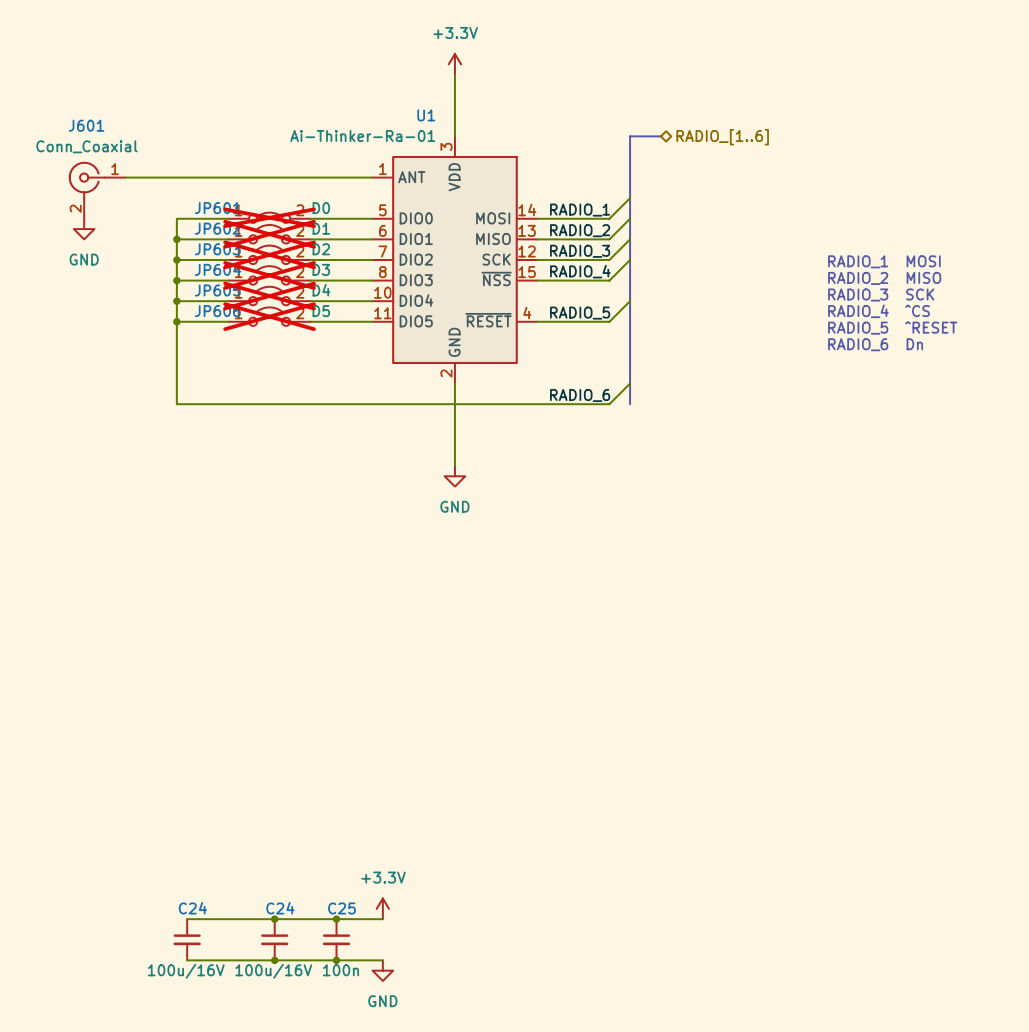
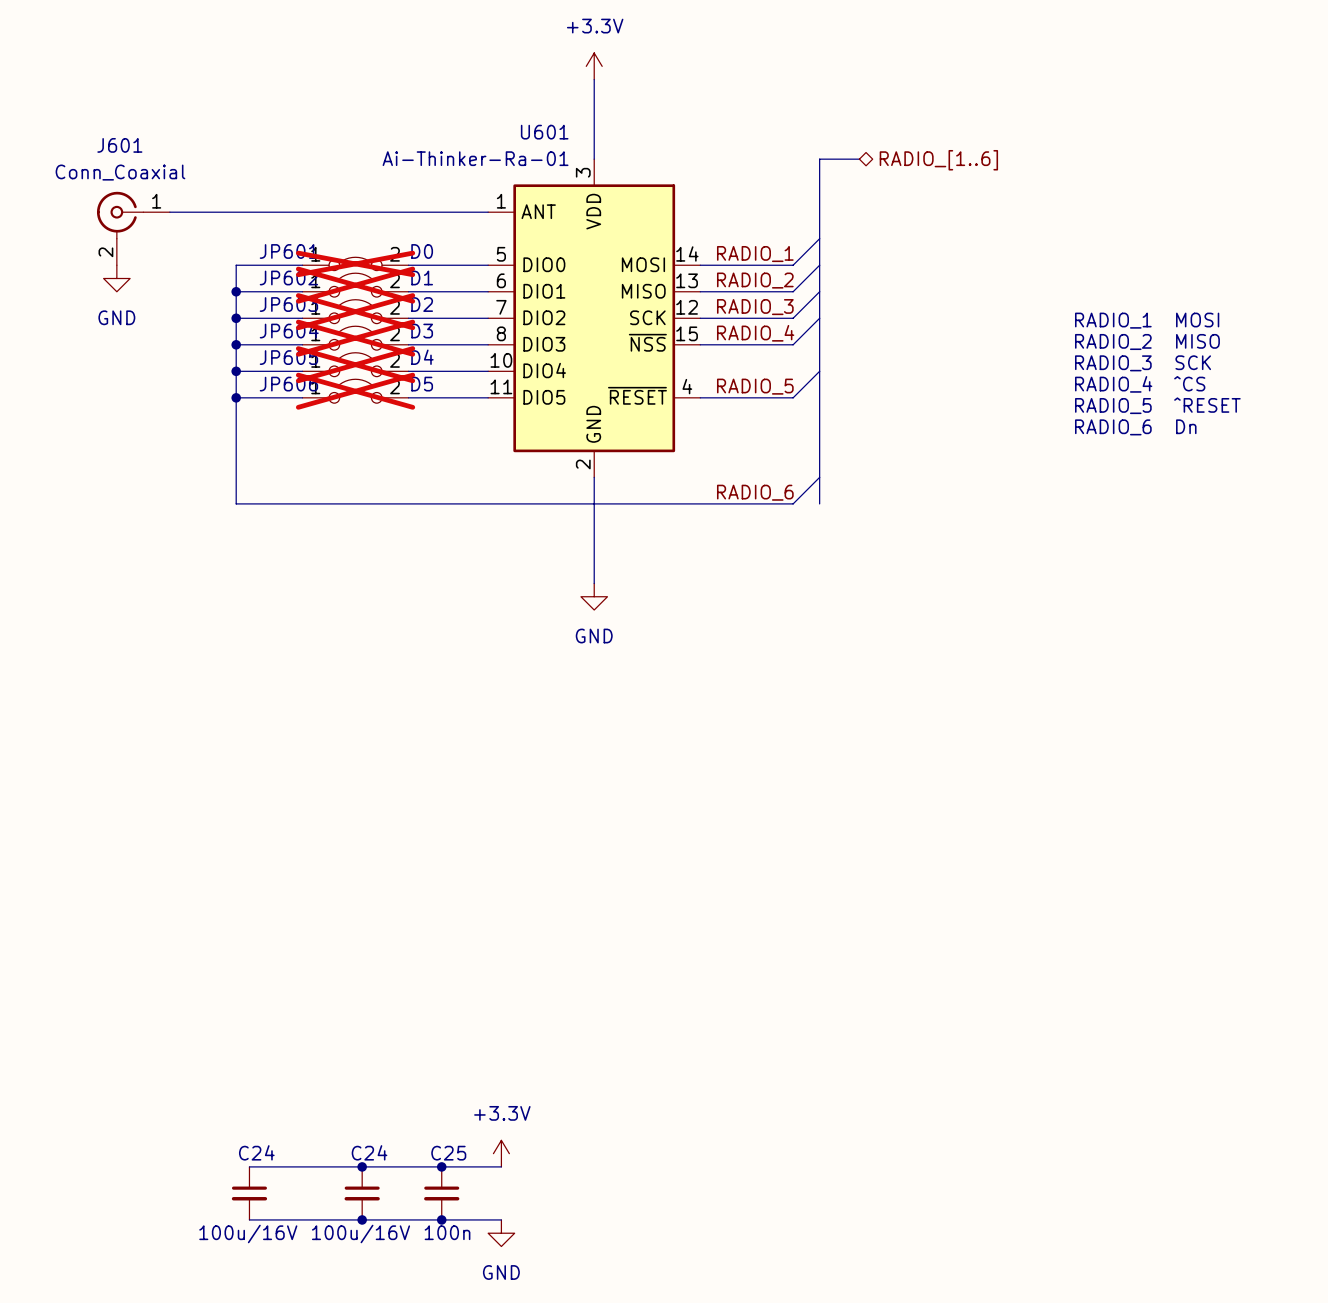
U1 name: U1 (426, 115) -> U601 (544, 132)

